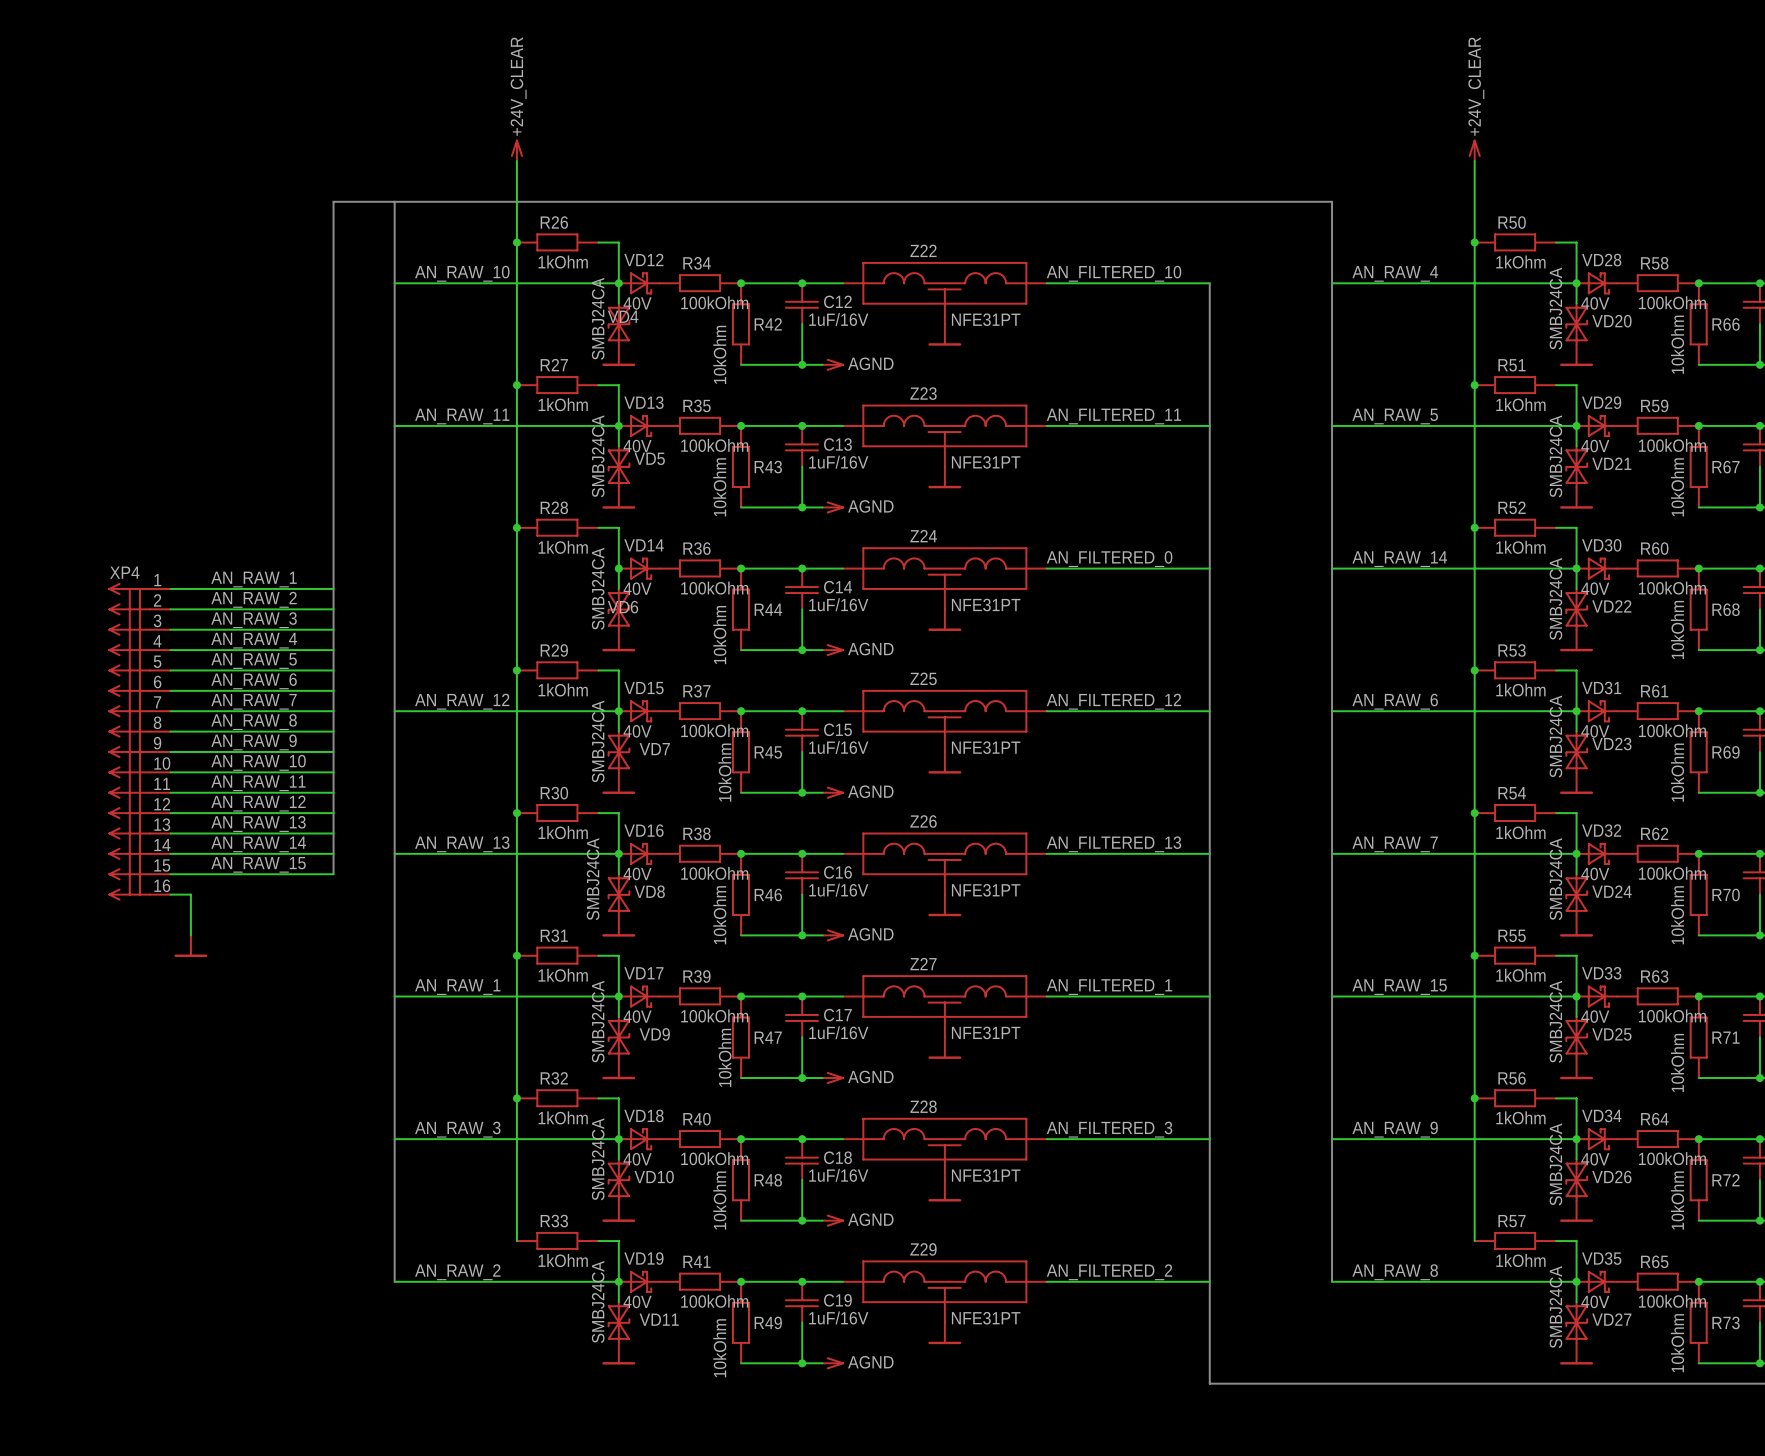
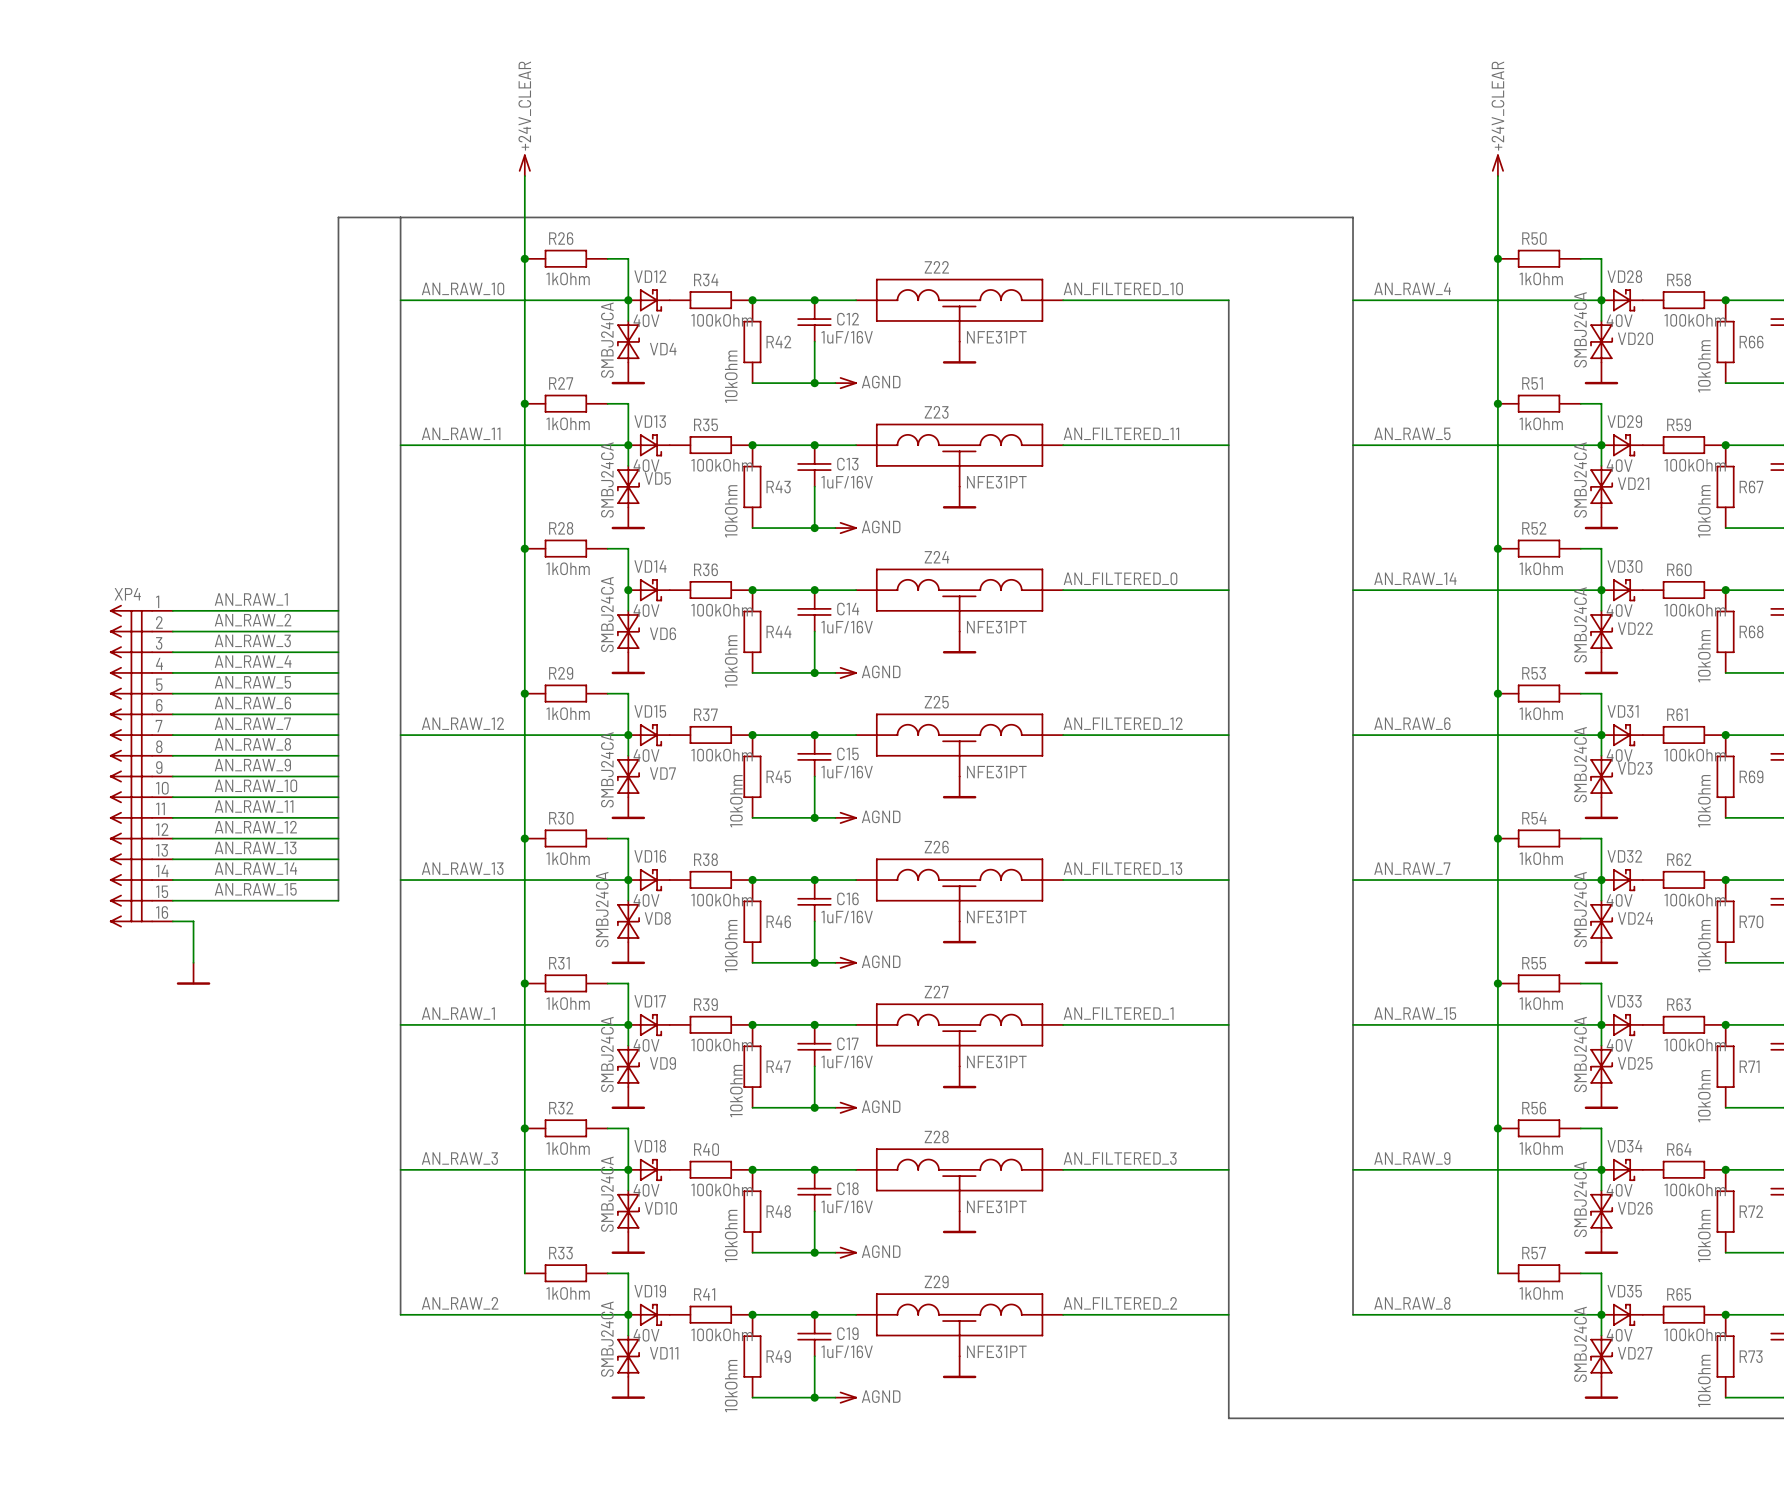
VD4 name position: VD4 (623, 316) -> VD4 (663, 349)
VD6 name position: VD6 (623, 607) -> VD6 (663, 633)

